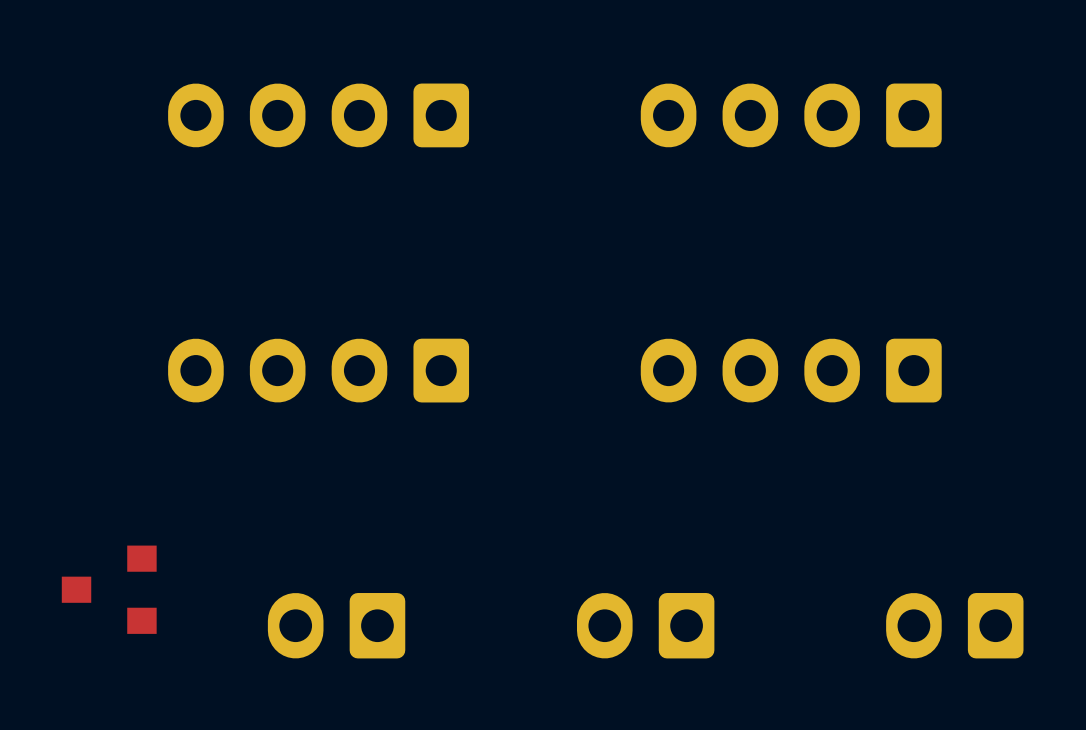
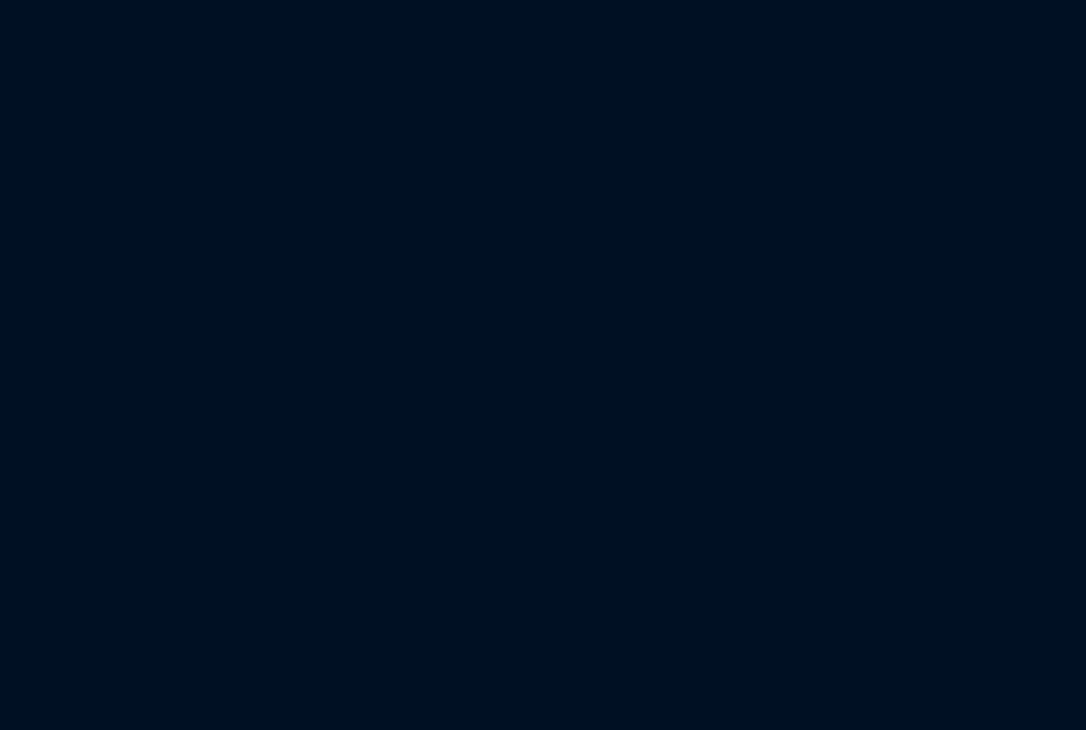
part: (318, 115) -> none
part: (791, 115) -> none
part: (318, 370) -> none
part: (791, 370) -> none
part: (109, 589) -> none
part: (336, 625) -> none
part: (645, 625) -> none
part: (954, 625) -> none

